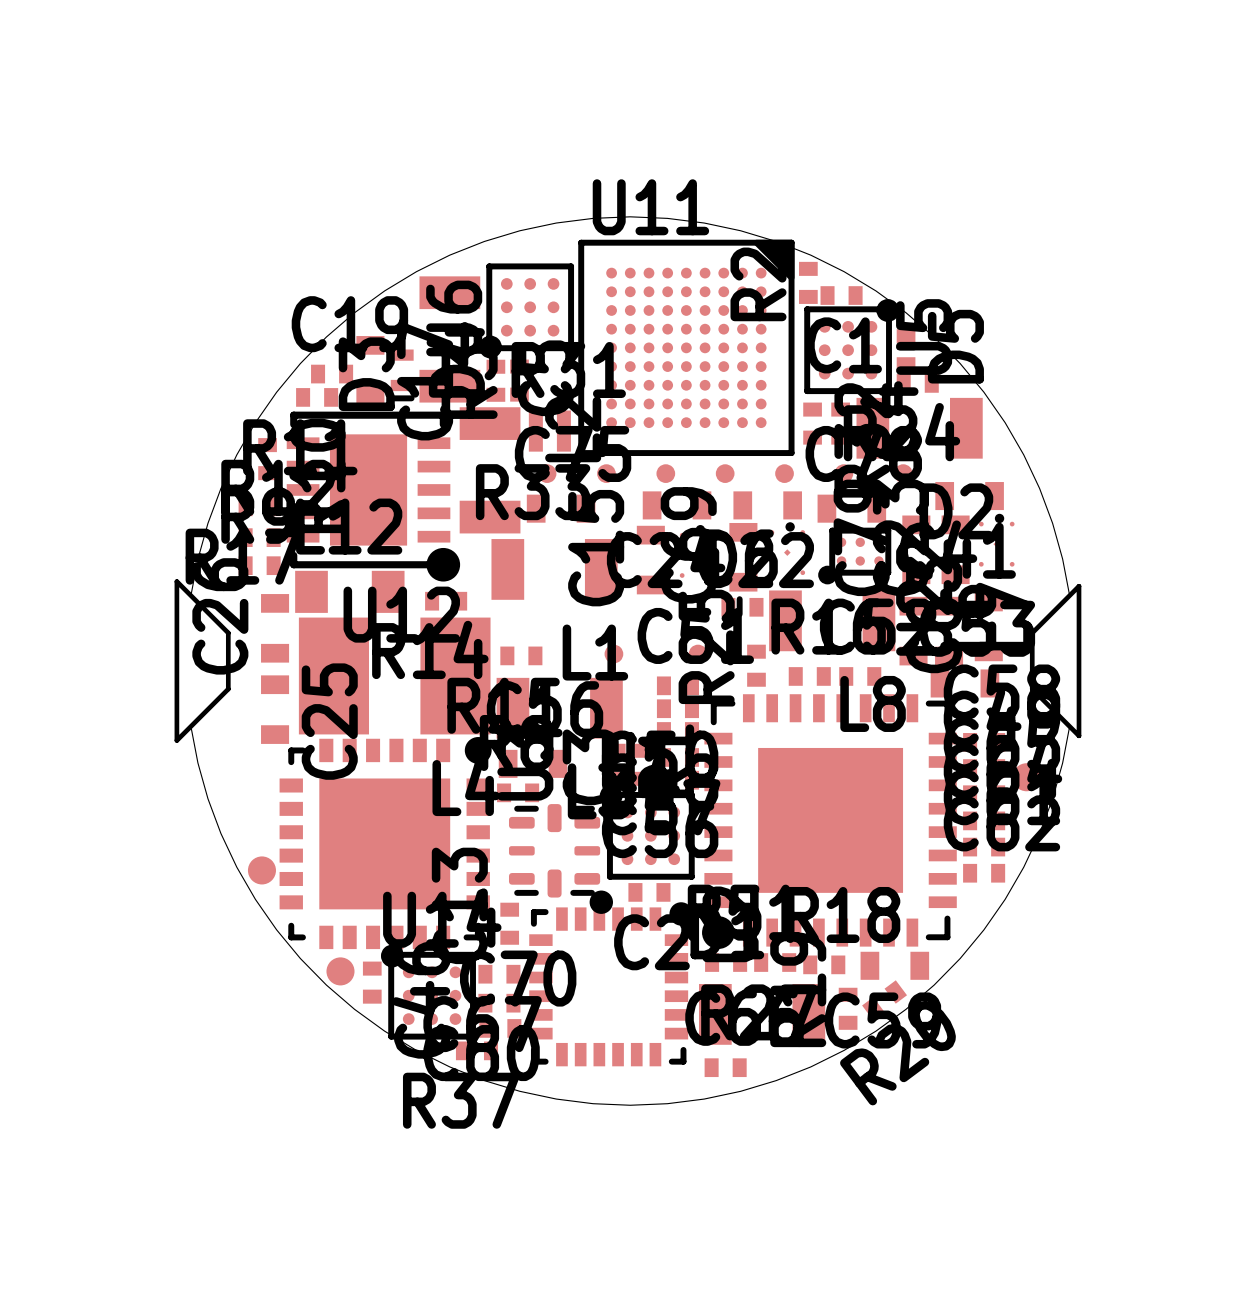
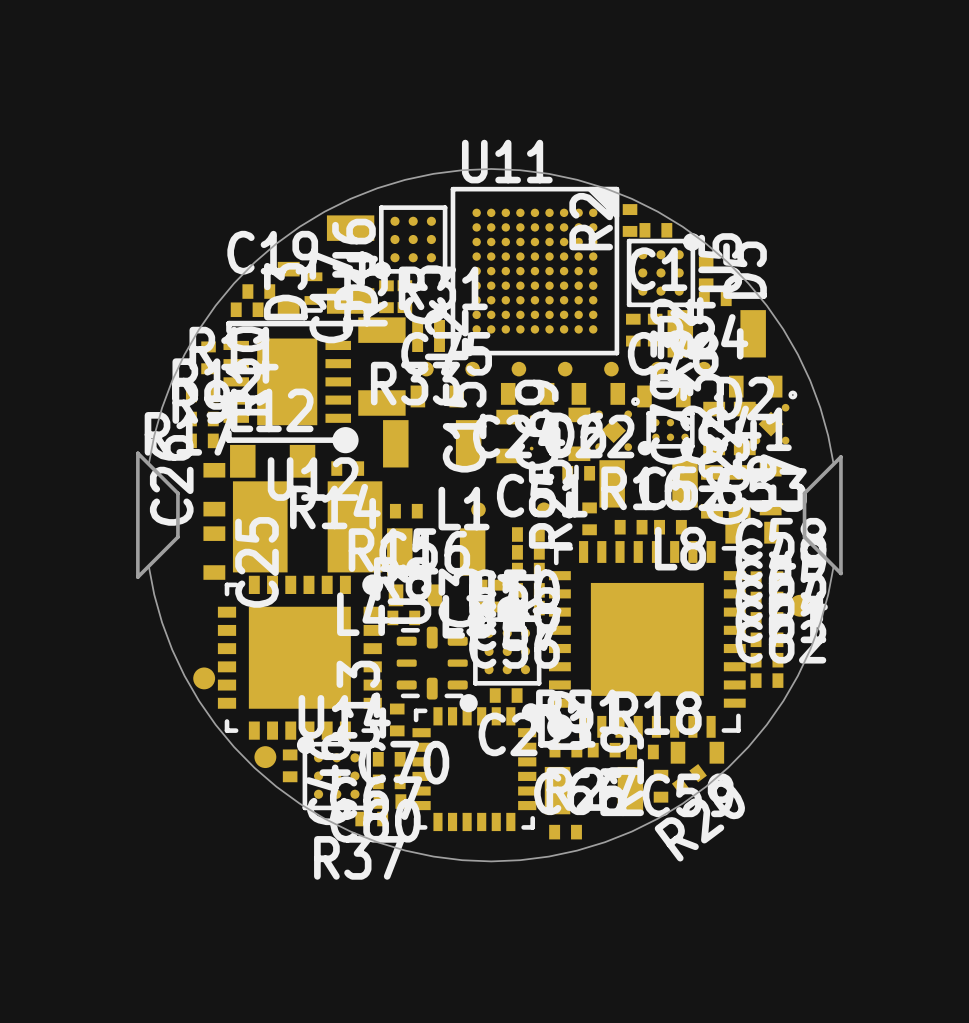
part footprint: [978, 513, 1015, 567] -> [752, 390, 798, 445]
part footprint: [769, 522, 806, 576] -> [595, 397, 640, 451]

